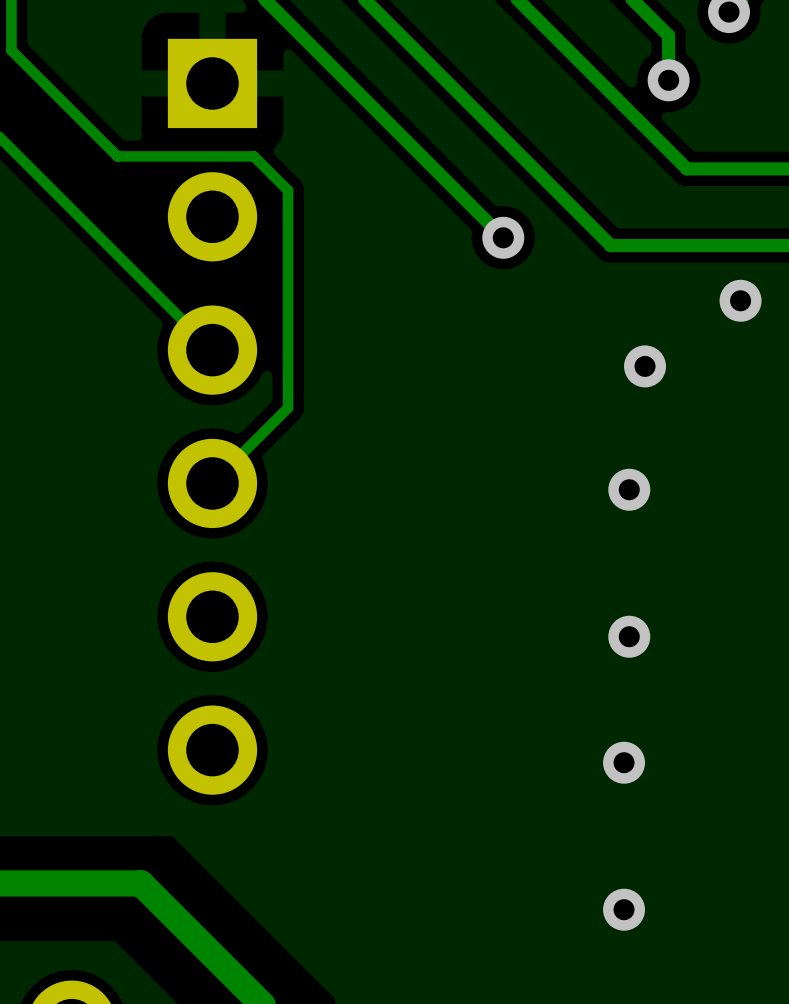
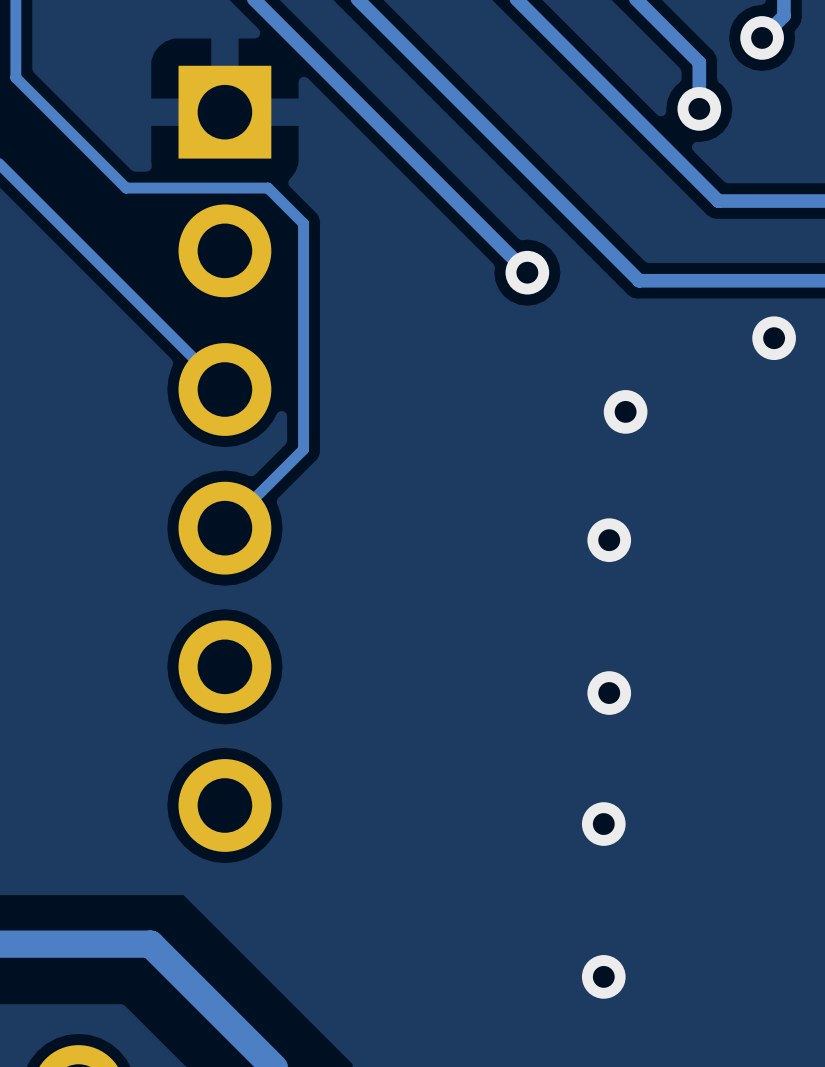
via position: (645, 366) -> (625, 411)
via position: (629, 489) -> (609, 540)
via position: (629, 636) -> (609, 693)
via position: (624, 762) -> (603, 824)
via position: (624, 909) -> (603, 976)

